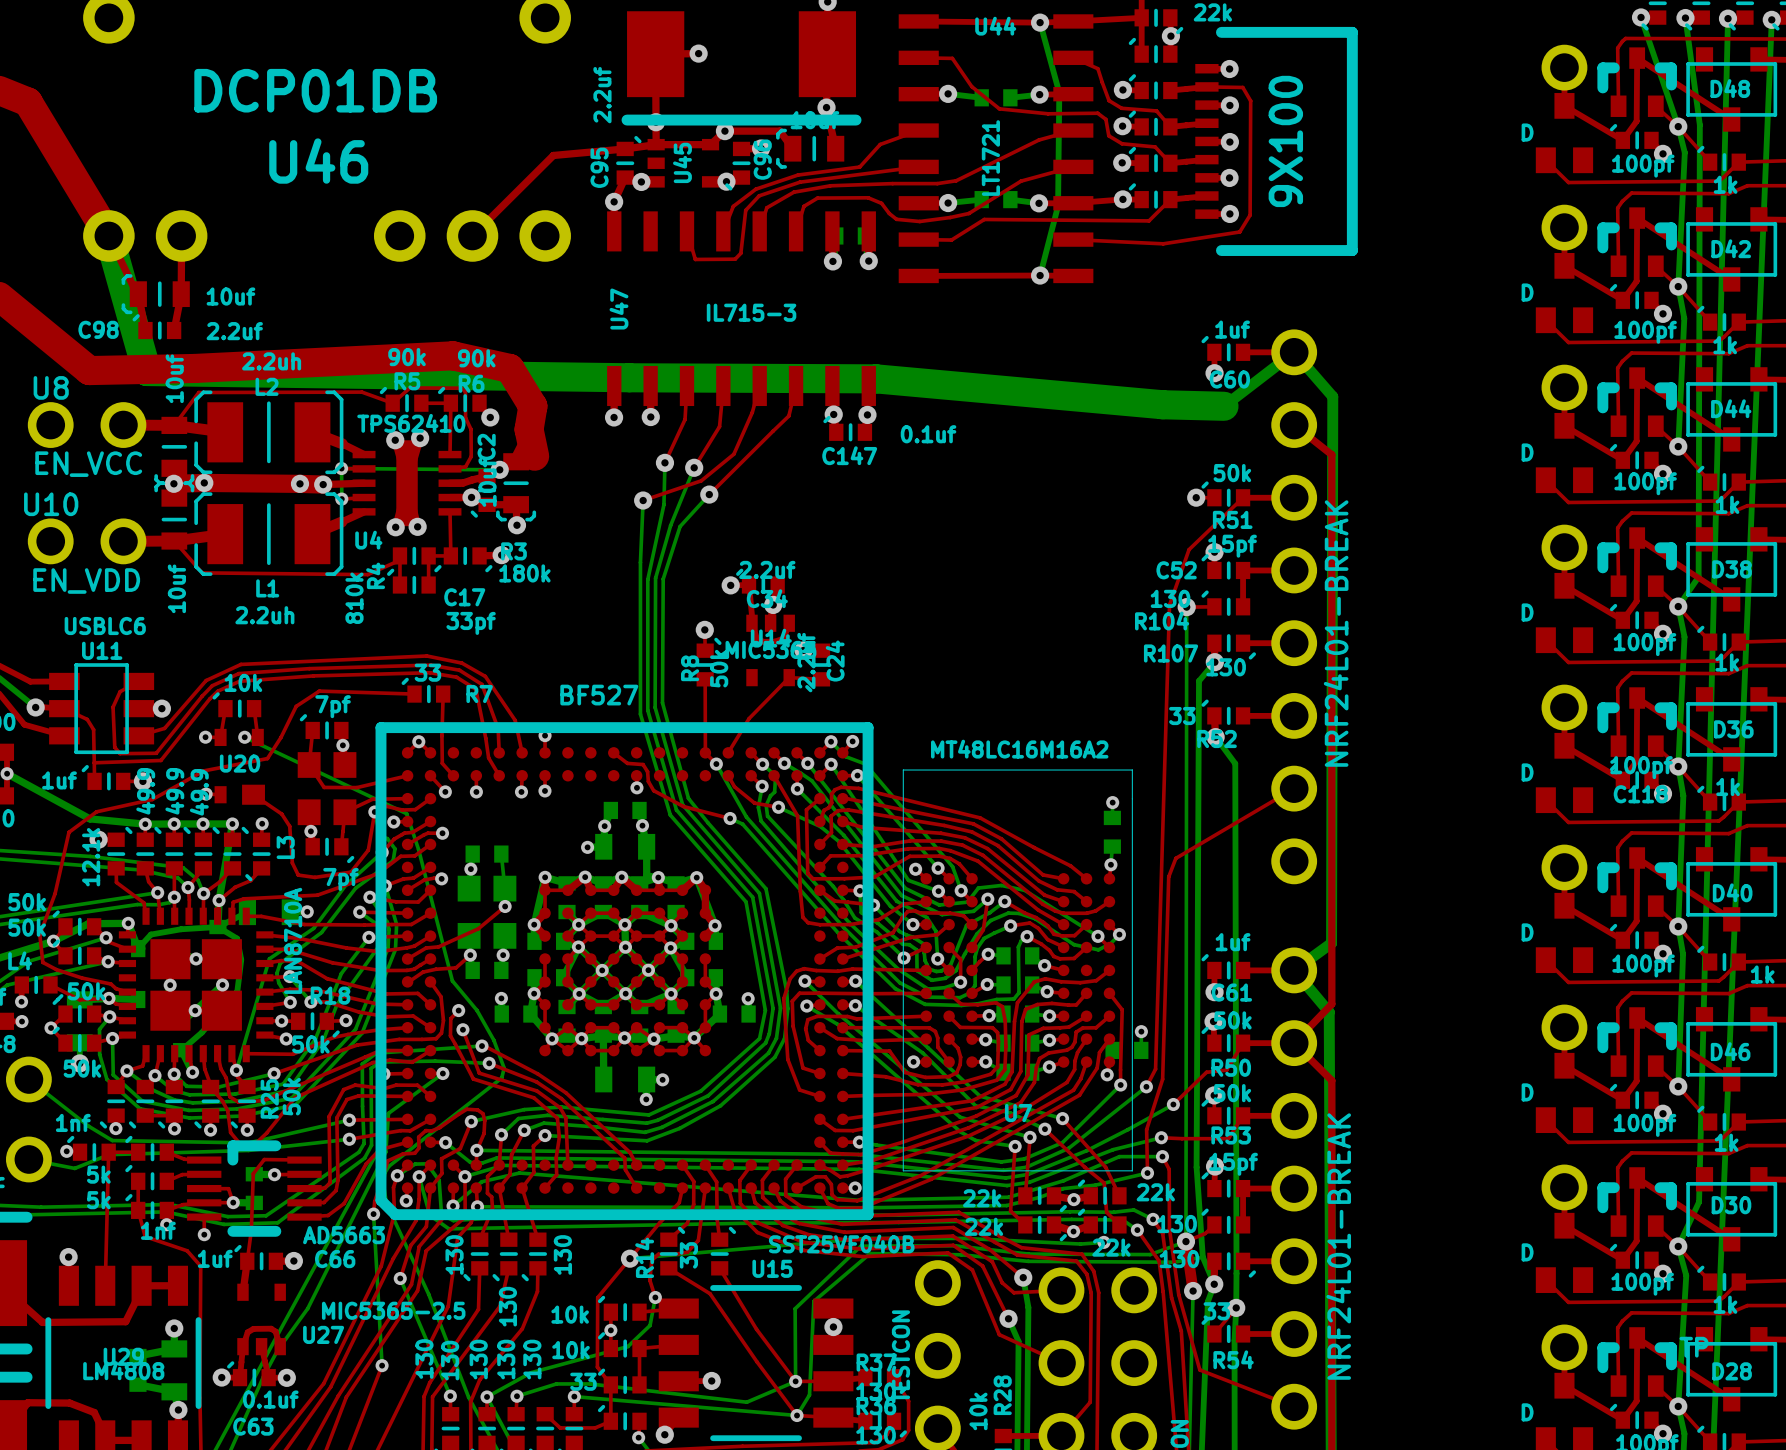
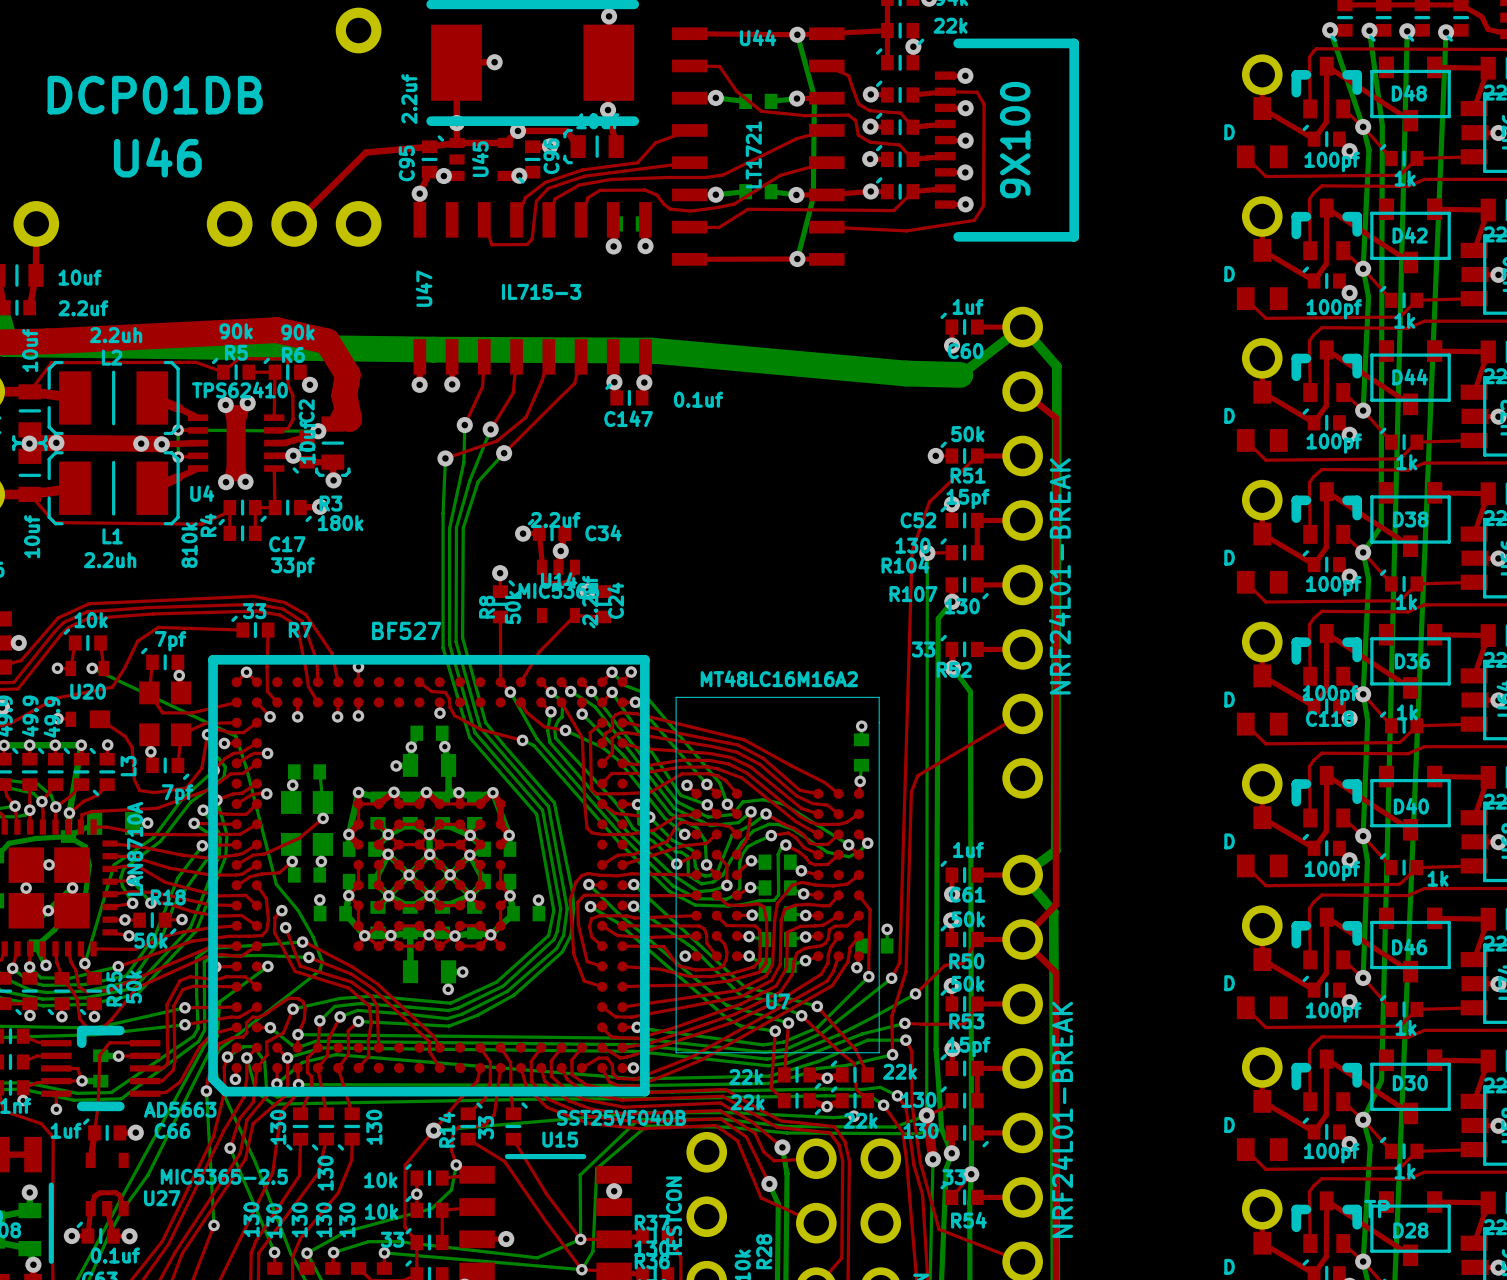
C34 name position: C34 (767, 598) -> C34 (603, 533)

